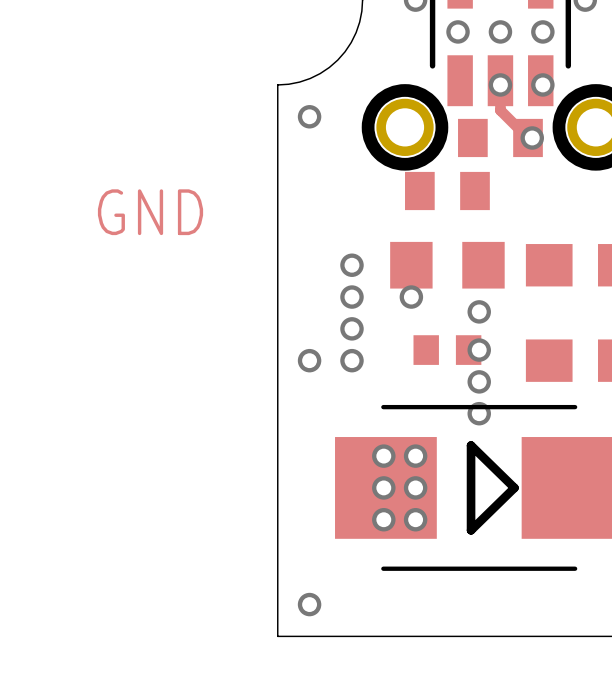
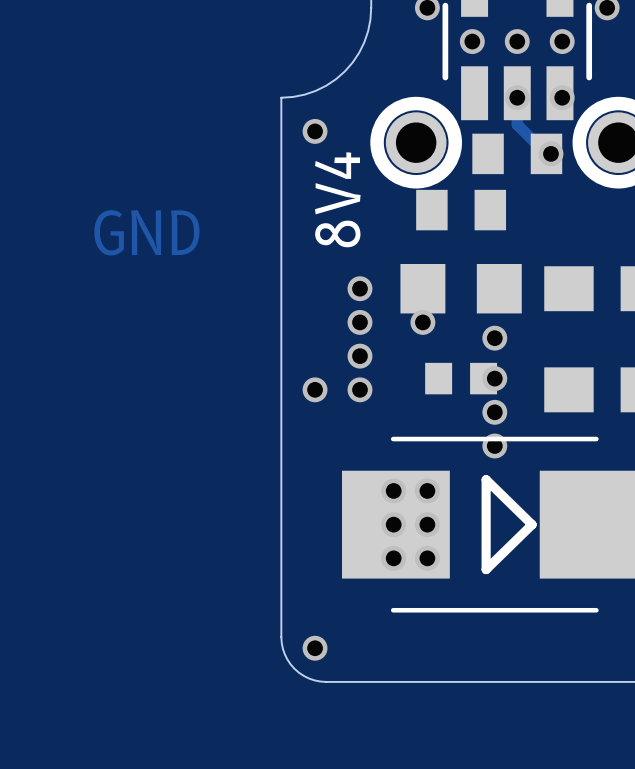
text: none -> 8V4 (337, 199)
board edge: (277, 593) (277, 636) (320, 636) -> (281, 637) (284, 654) (294, 668) (309, 678) (326, 681)

